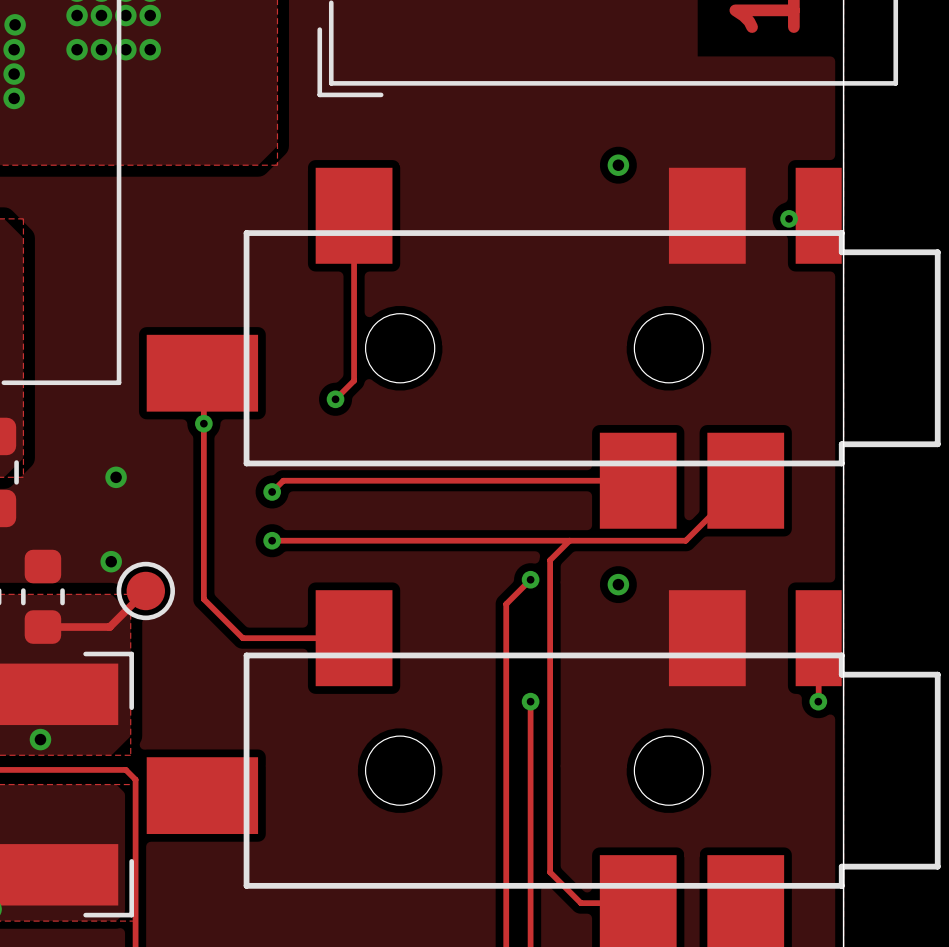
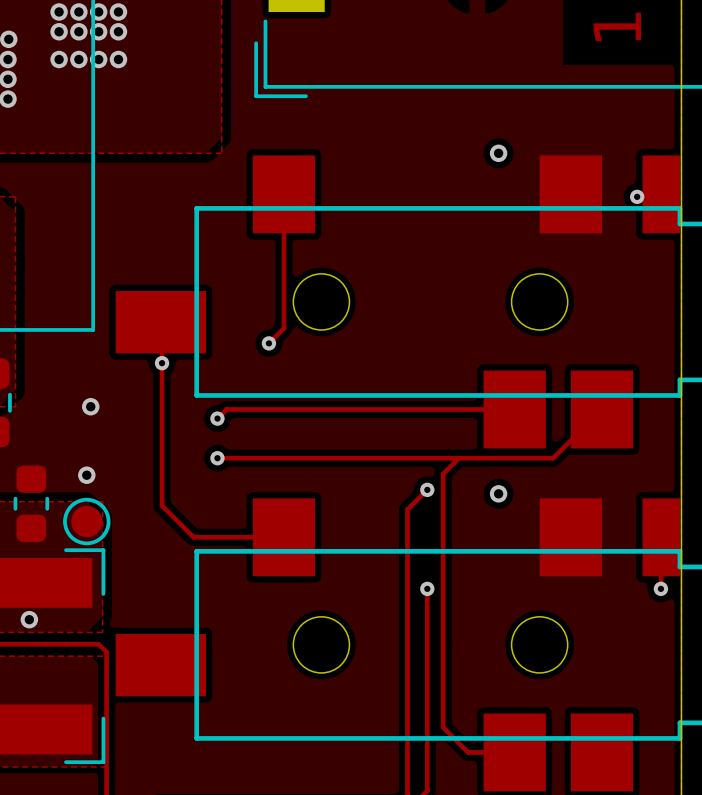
track: (145, 590) (109, 627) (42, 627) -> none
part position: (145, 590) -> (86, 521)

